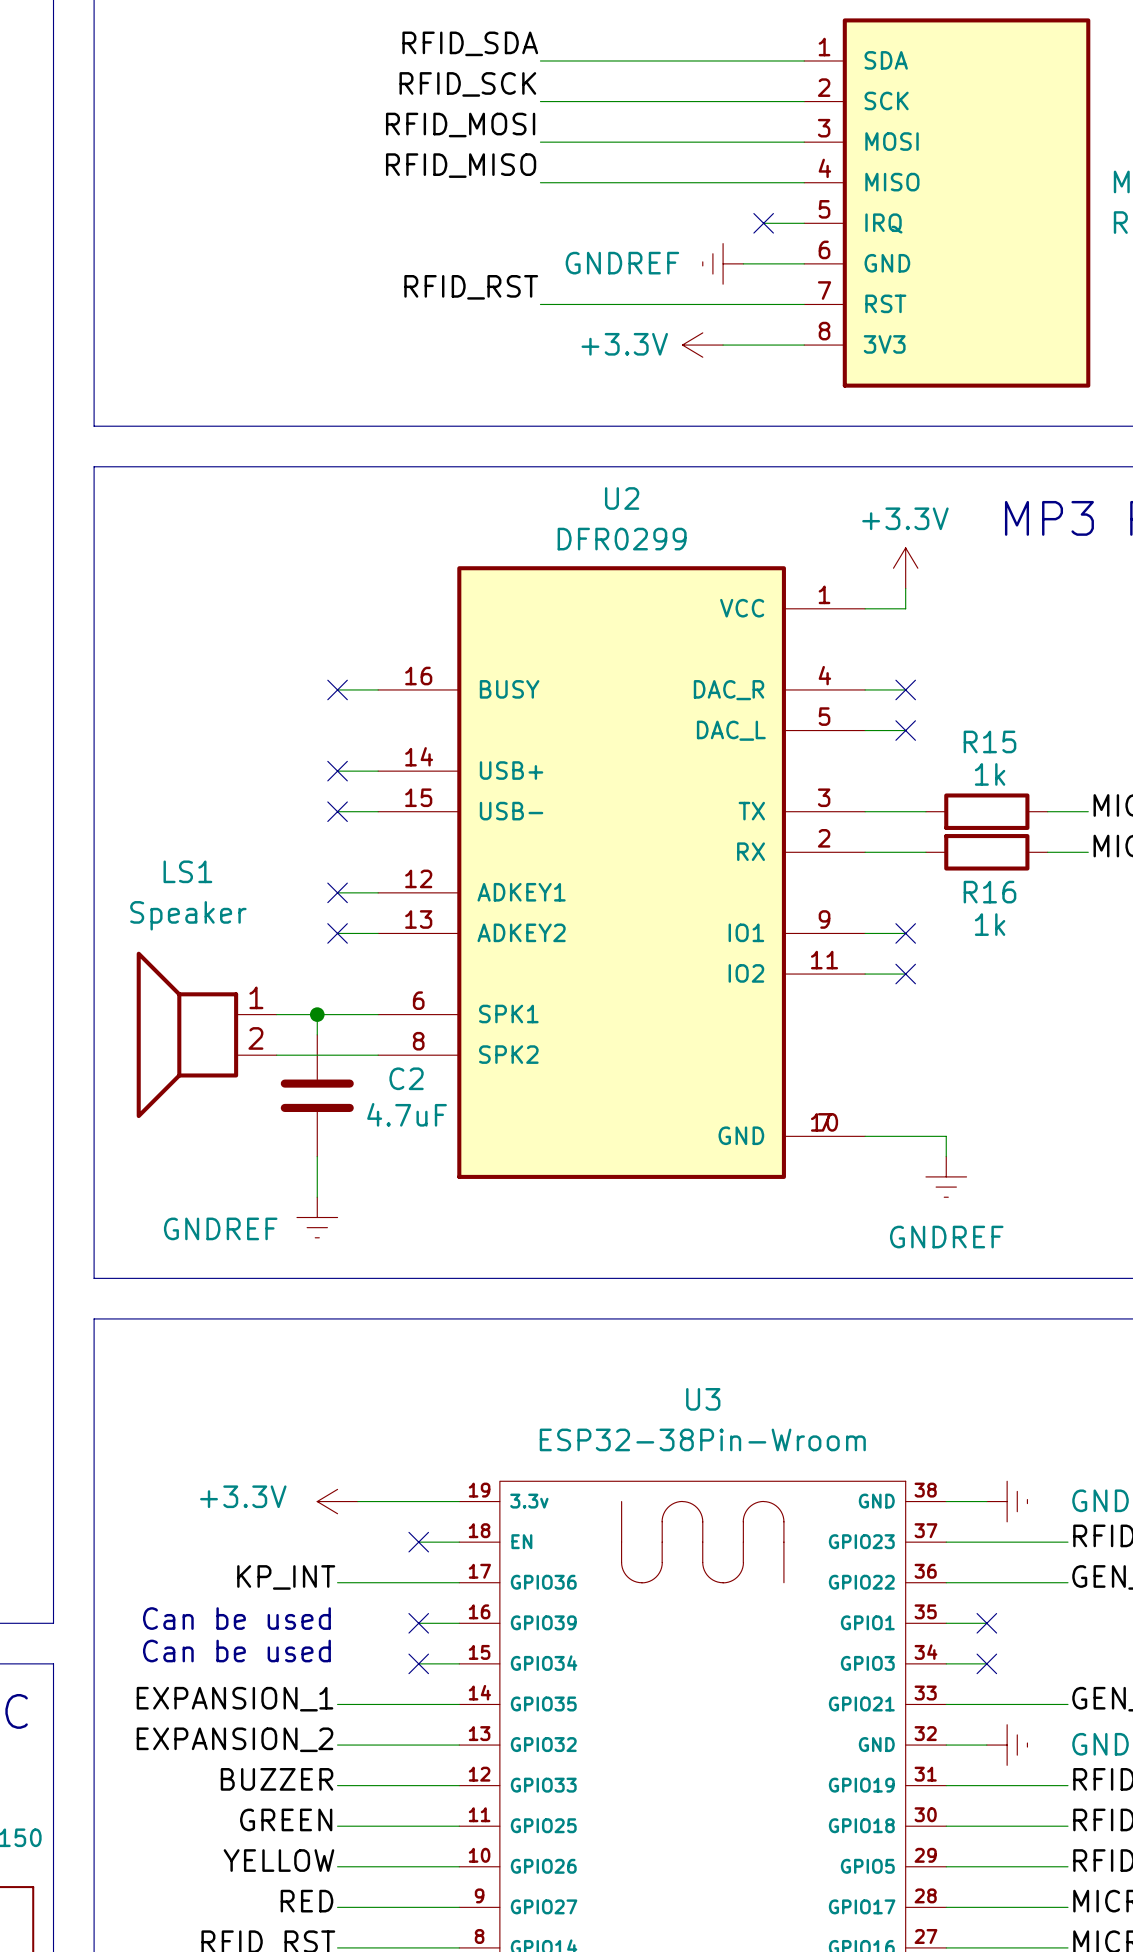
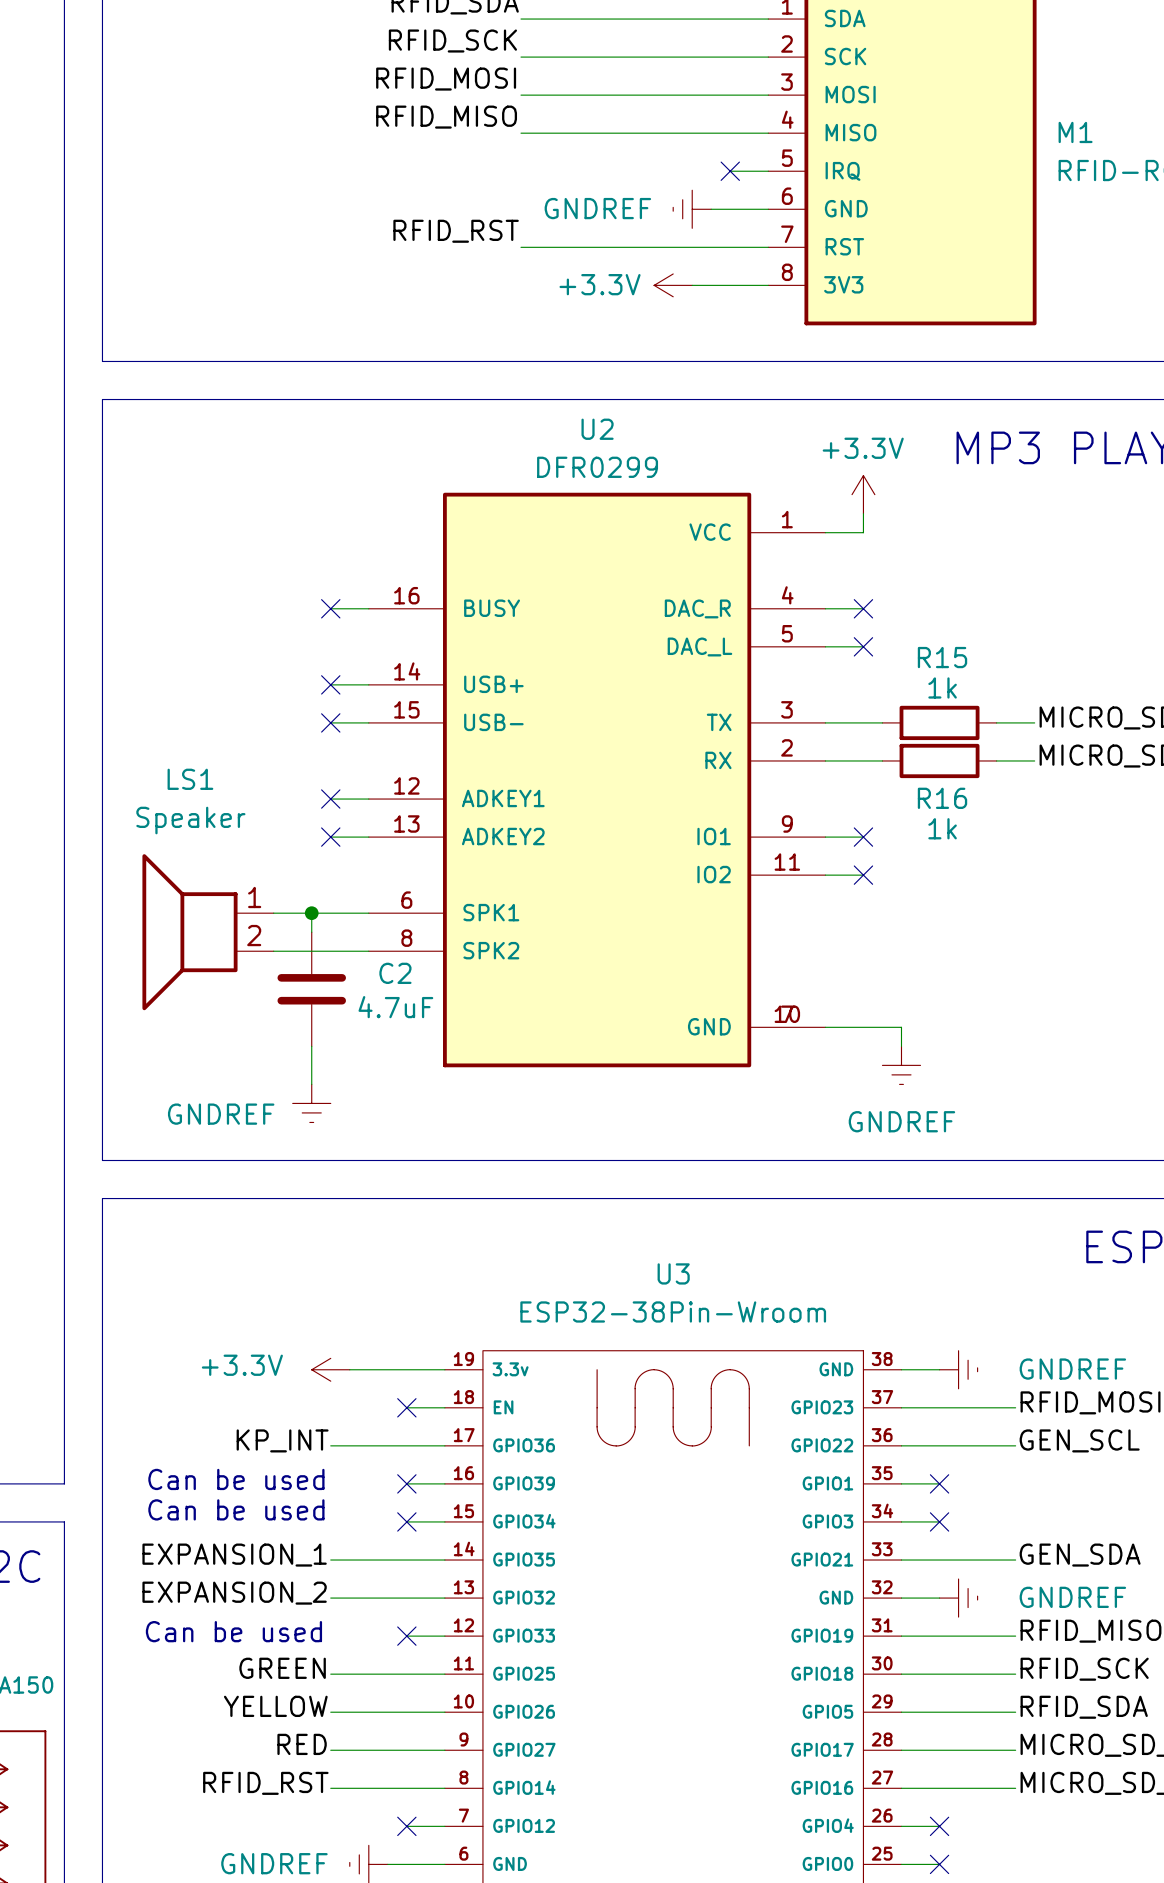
label: BUZZER (277, 1779) -> none
text: none -> Can be used (233, 1631)
wire: (337, 1785) (418, 1785) -> none
no-connect mark: none -> (406, 1636)

